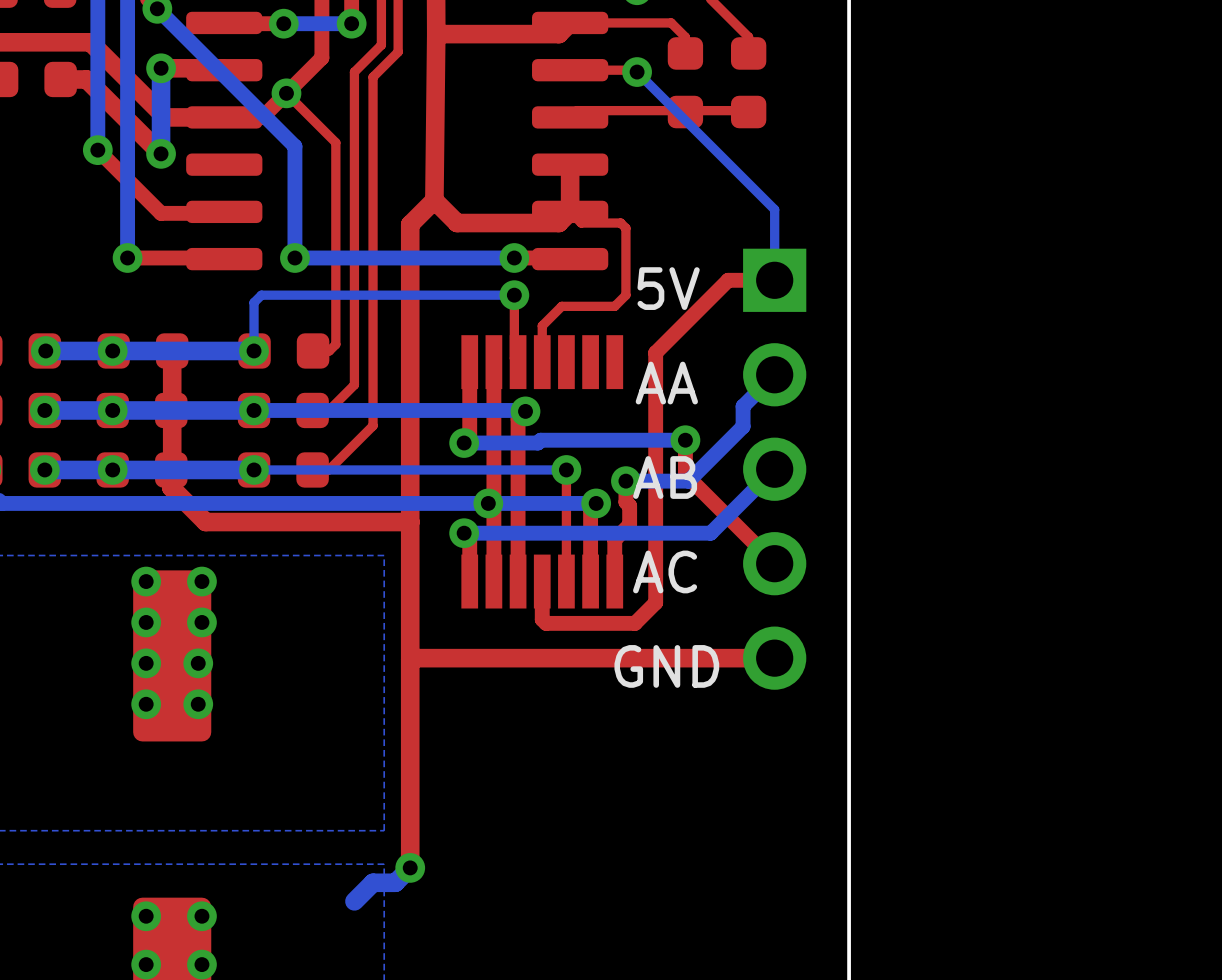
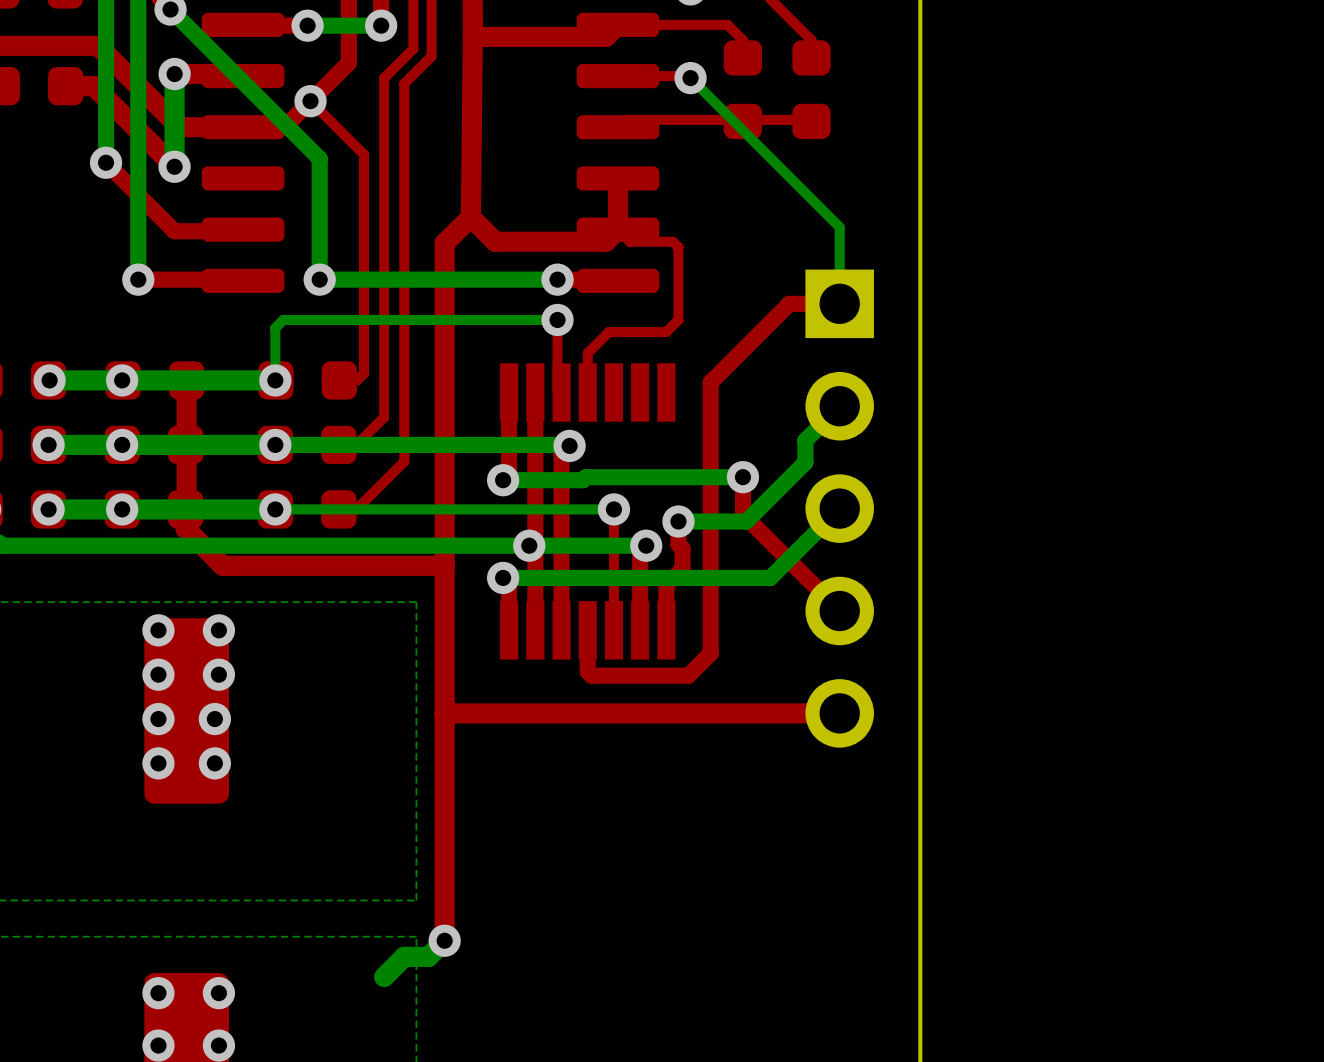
text: 5V (668, 288) -> none
text: AA (666, 383) -> none
text: AB (665, 477) -> none
text: AC (665, 571) -> none
text: GND (666, 666) -> none

